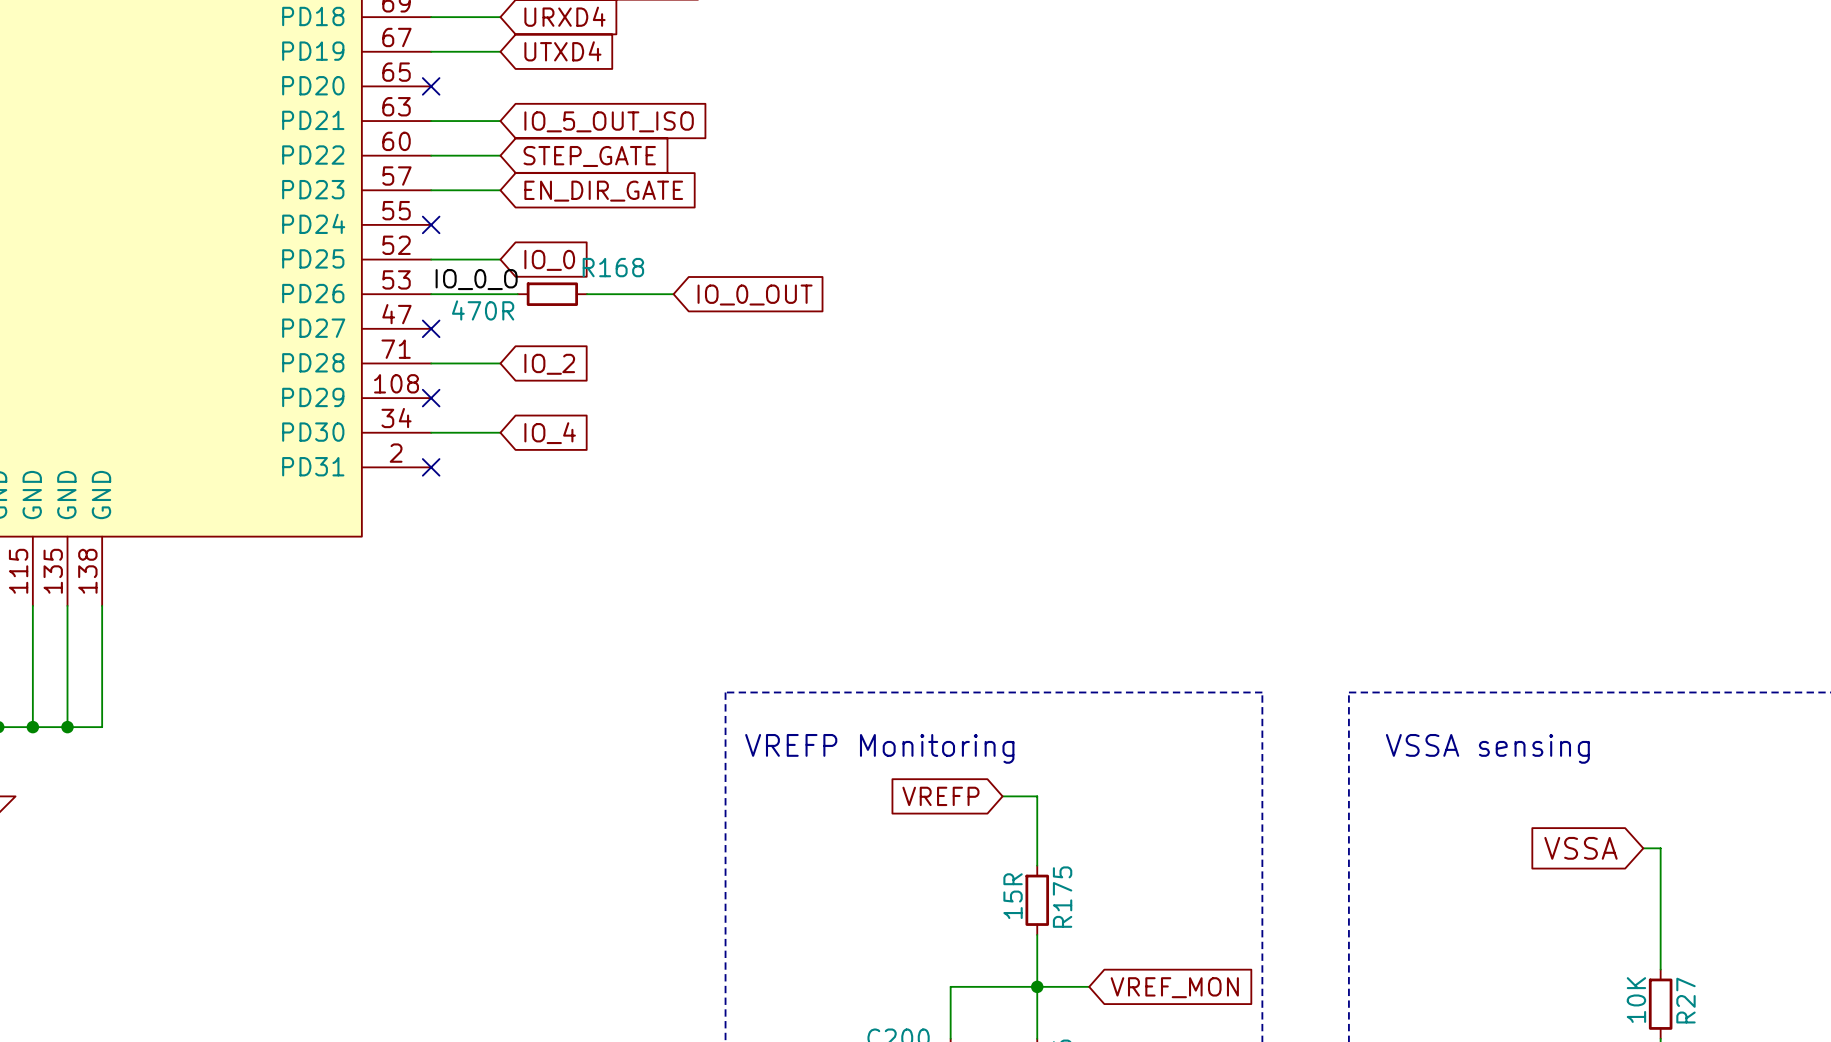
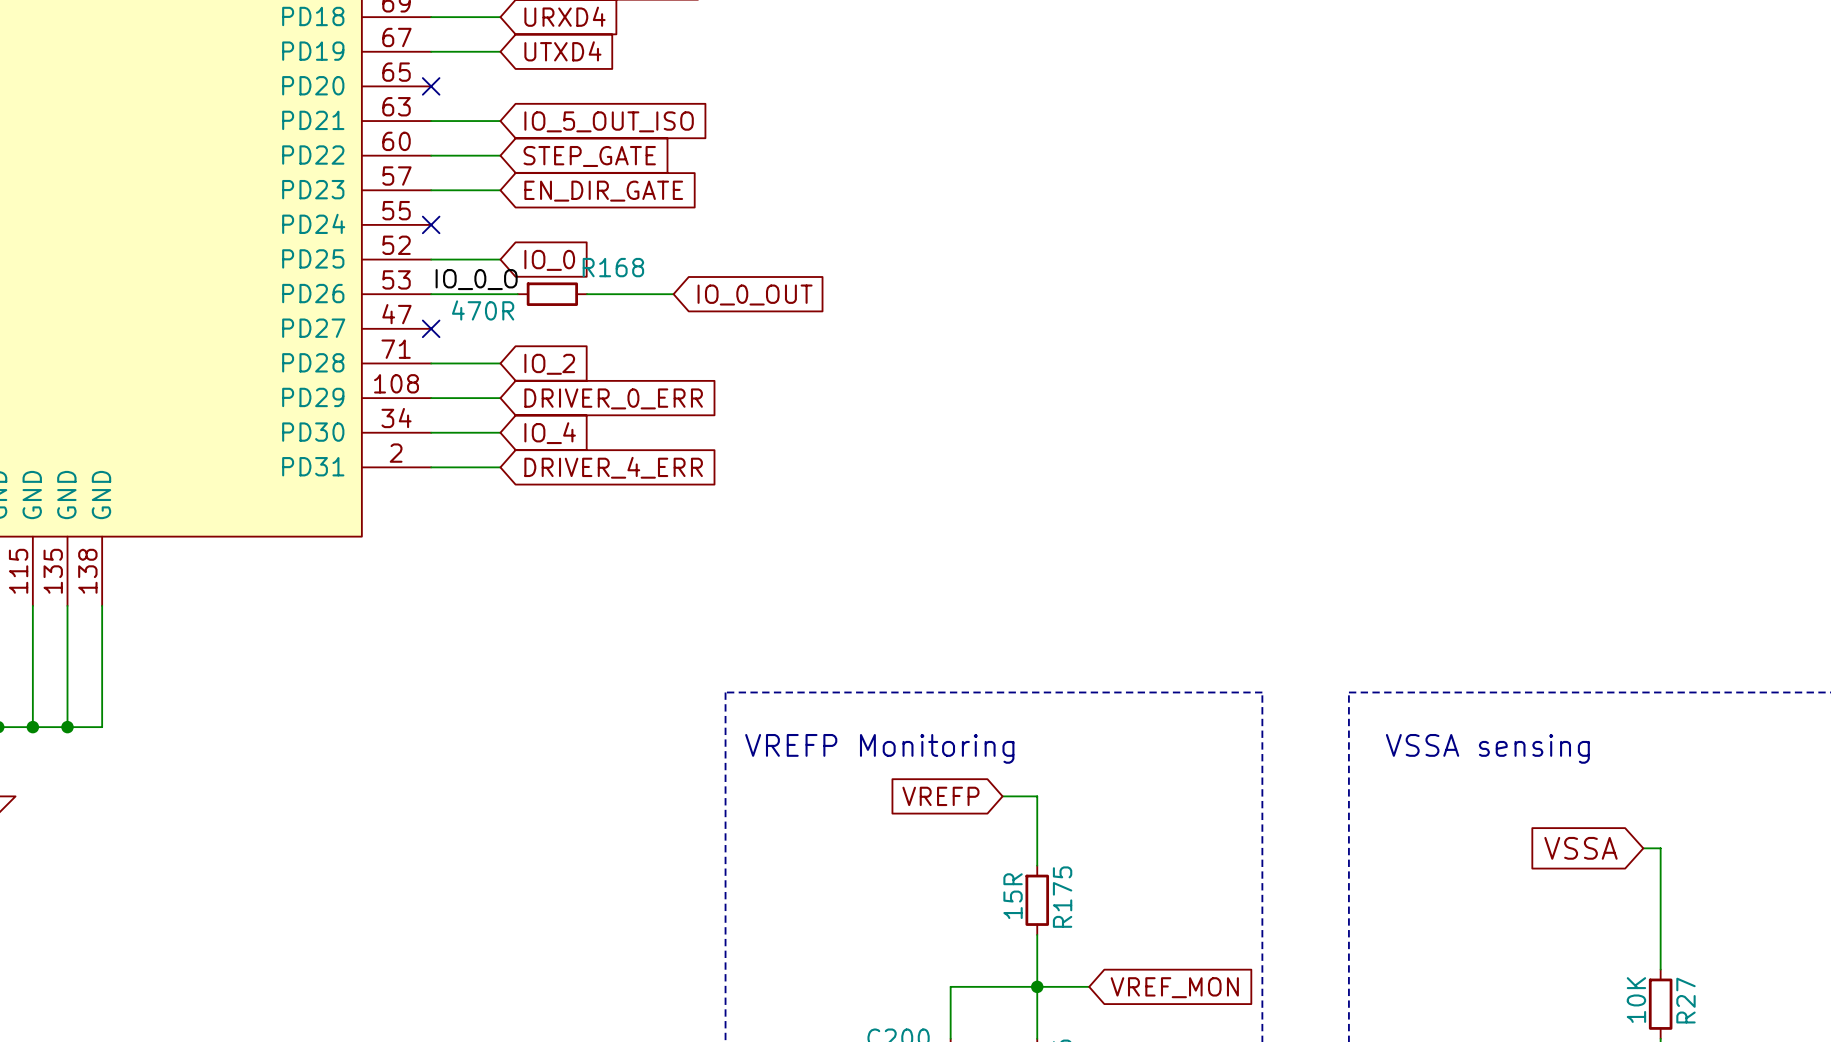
wire: none -> (431, 398) (500, 398)
no-connect mark: (431, 398) -> none
global label: none -> DRIVER_0_ERR (613, 398)
wire: none -> (431, 467) (500, 467)
no-connect mark: (431, 467) -> none
global label: none -> DRIVER_4_ERR (613, 467)

